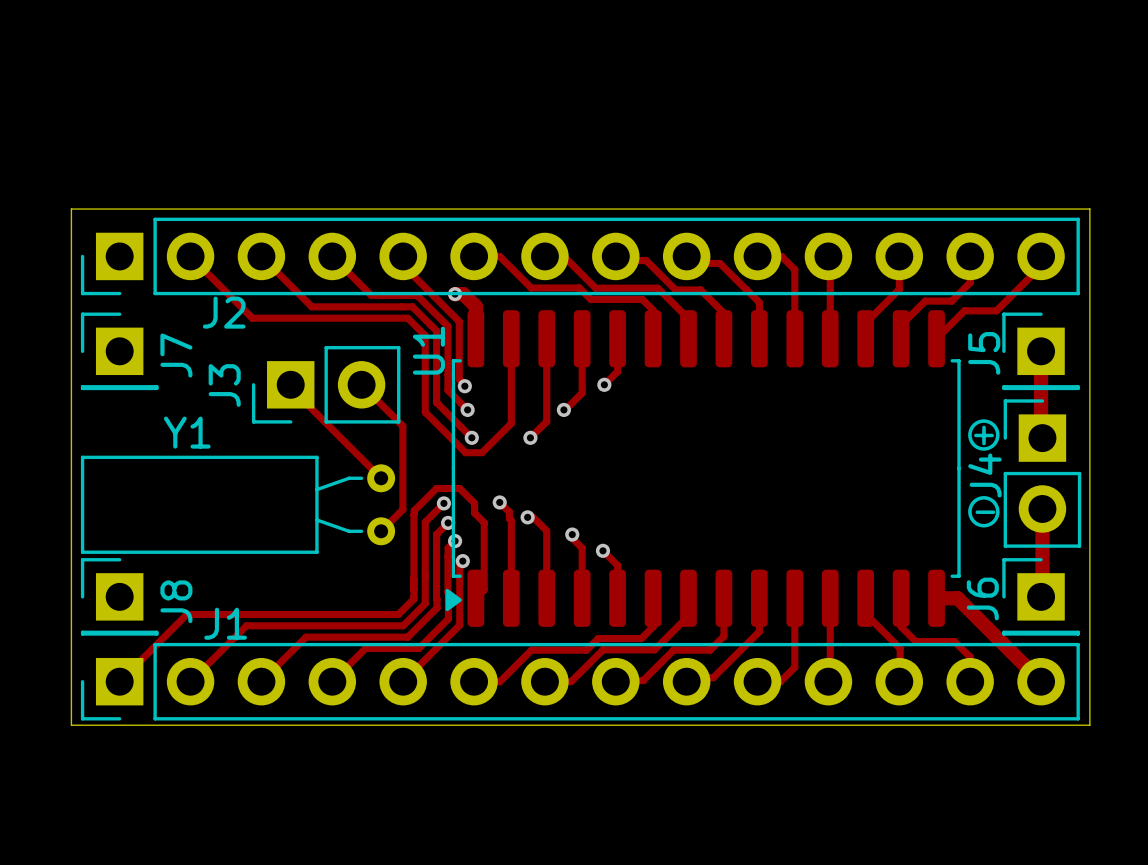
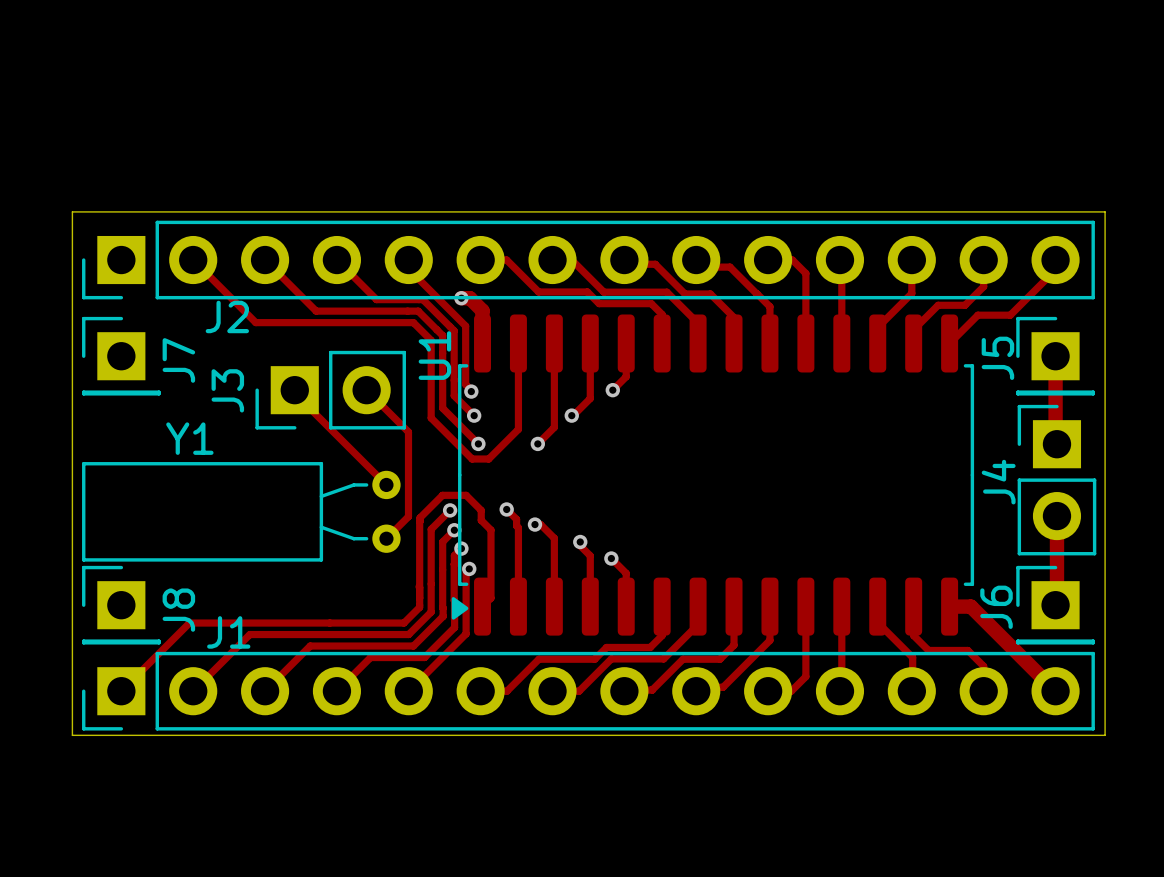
drawing: [968, 419, 1000, 451] -> none
text: + (983, 435) -> none
drawing: [968, 496, 1000, 528] -> none
text: - (985, 512) -> none

